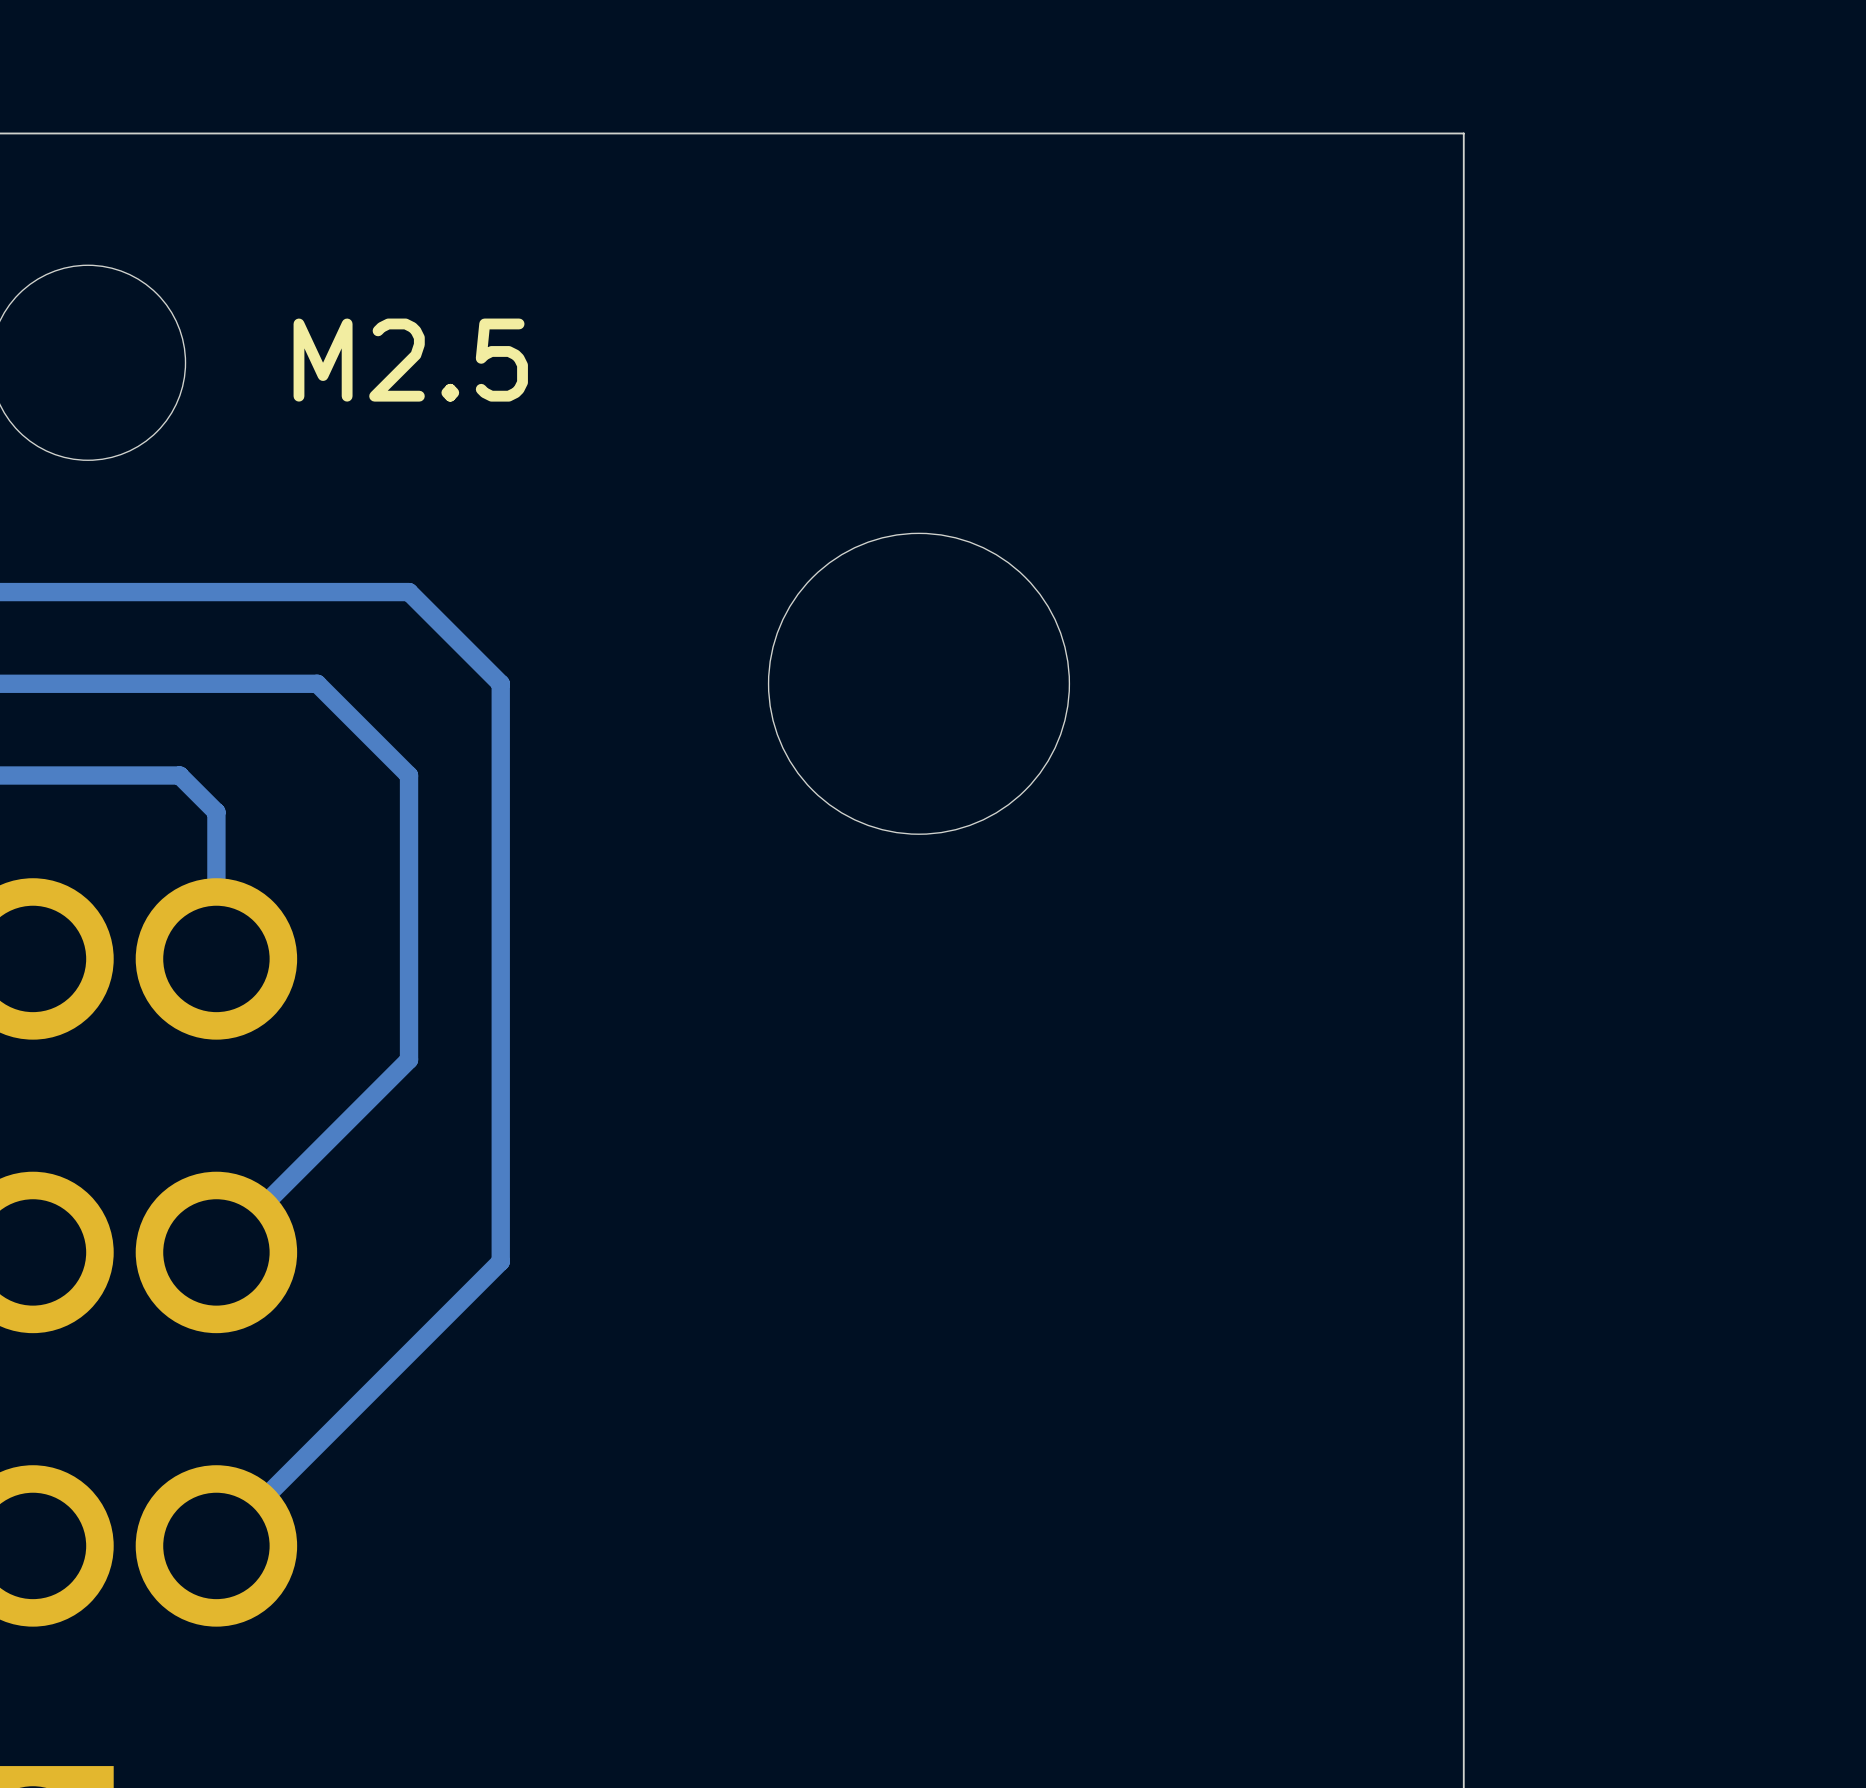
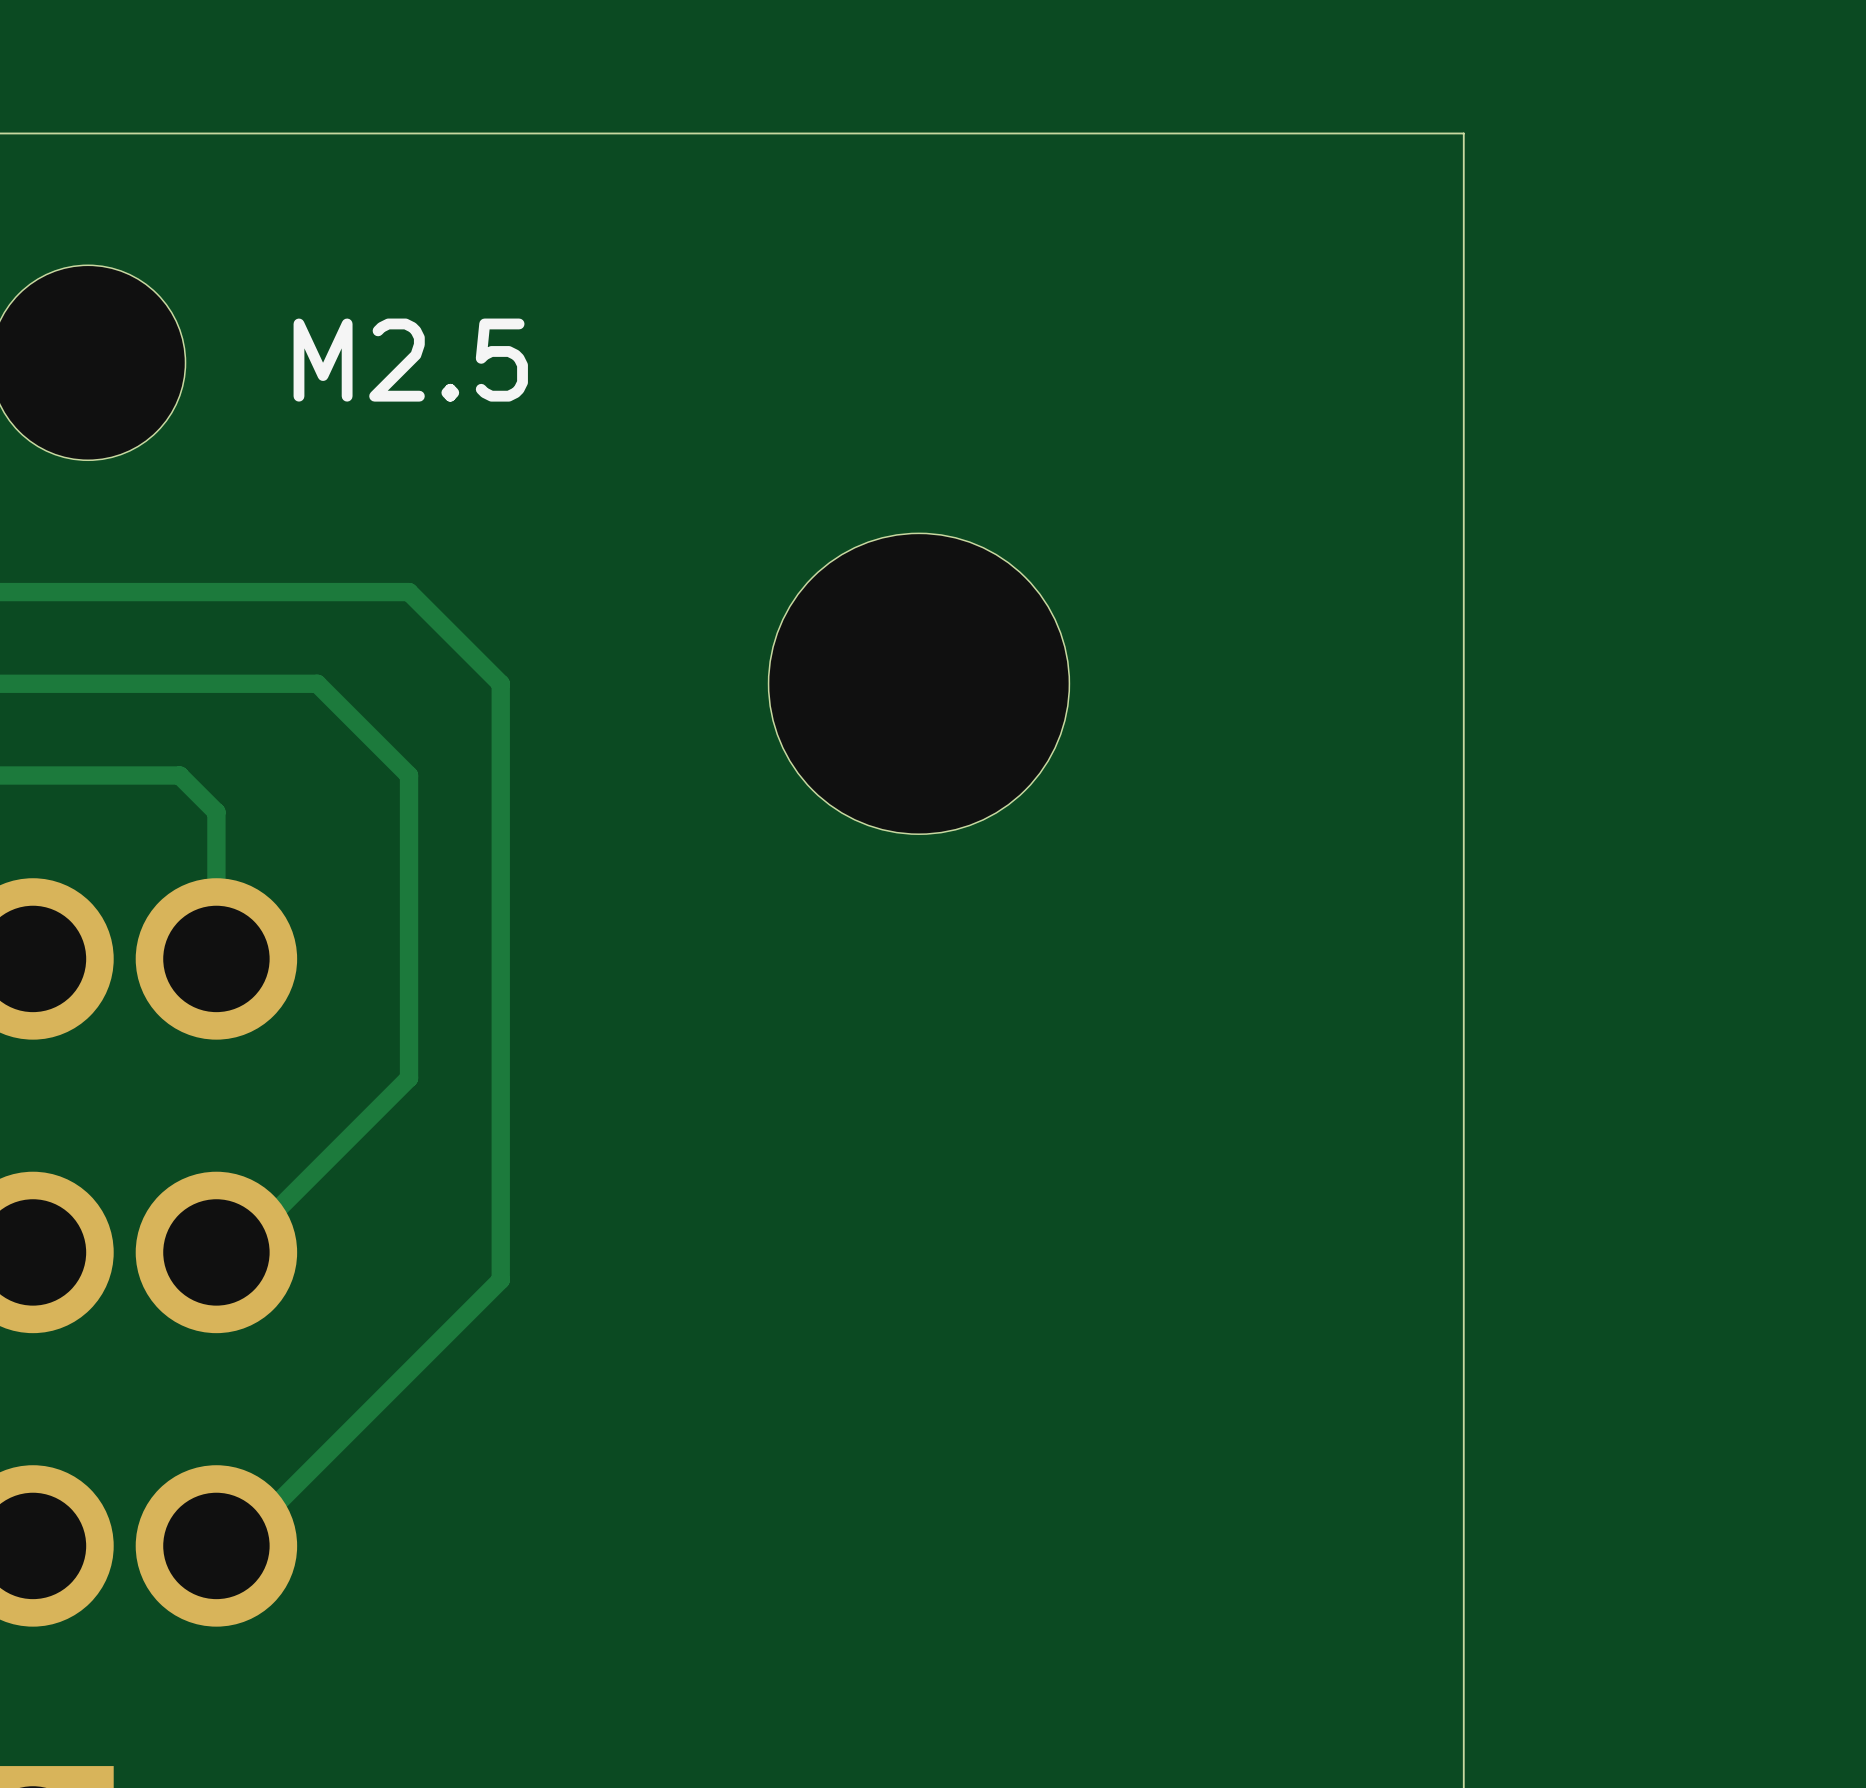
track: (409, 1059) (216, 1252) -> (409, 1059) (409, 1078) (216, 1270)
track: (500, 1261) (216, 1545) -> (500, 1261) (500, 1279) (216, 1564)

